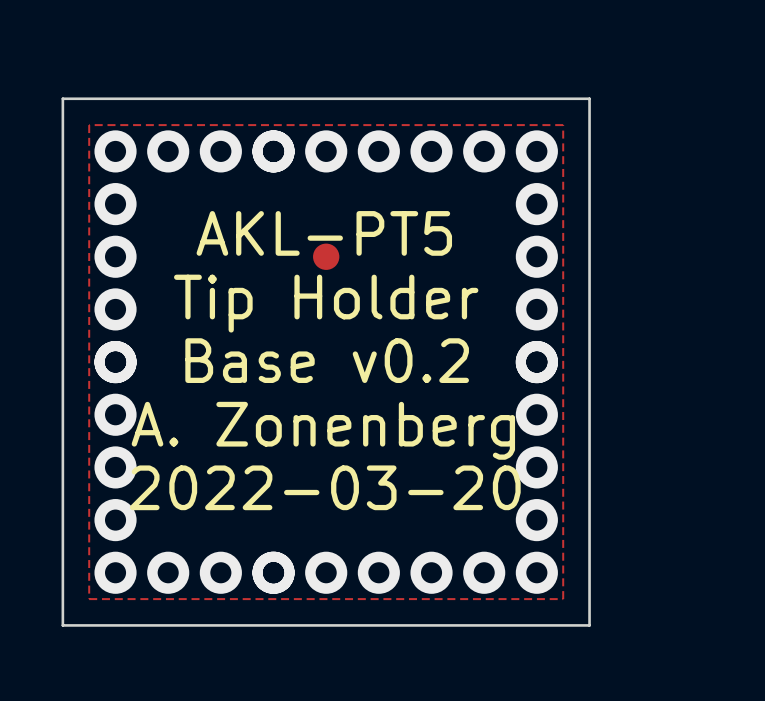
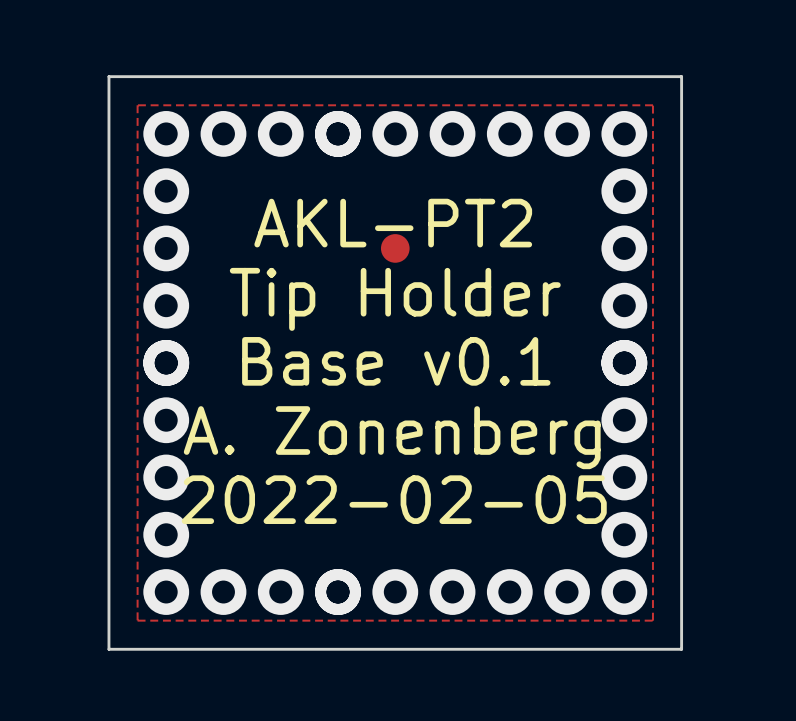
text: AKL-PT5 (324, 233) -> AKL-PT2 (393, 223)
text: Base v0.2 (327, 360) -> Base v0.1 (396, 361)
text: 2022-03-20 (325, 487) -> 2022-02-05 (394, 499)

